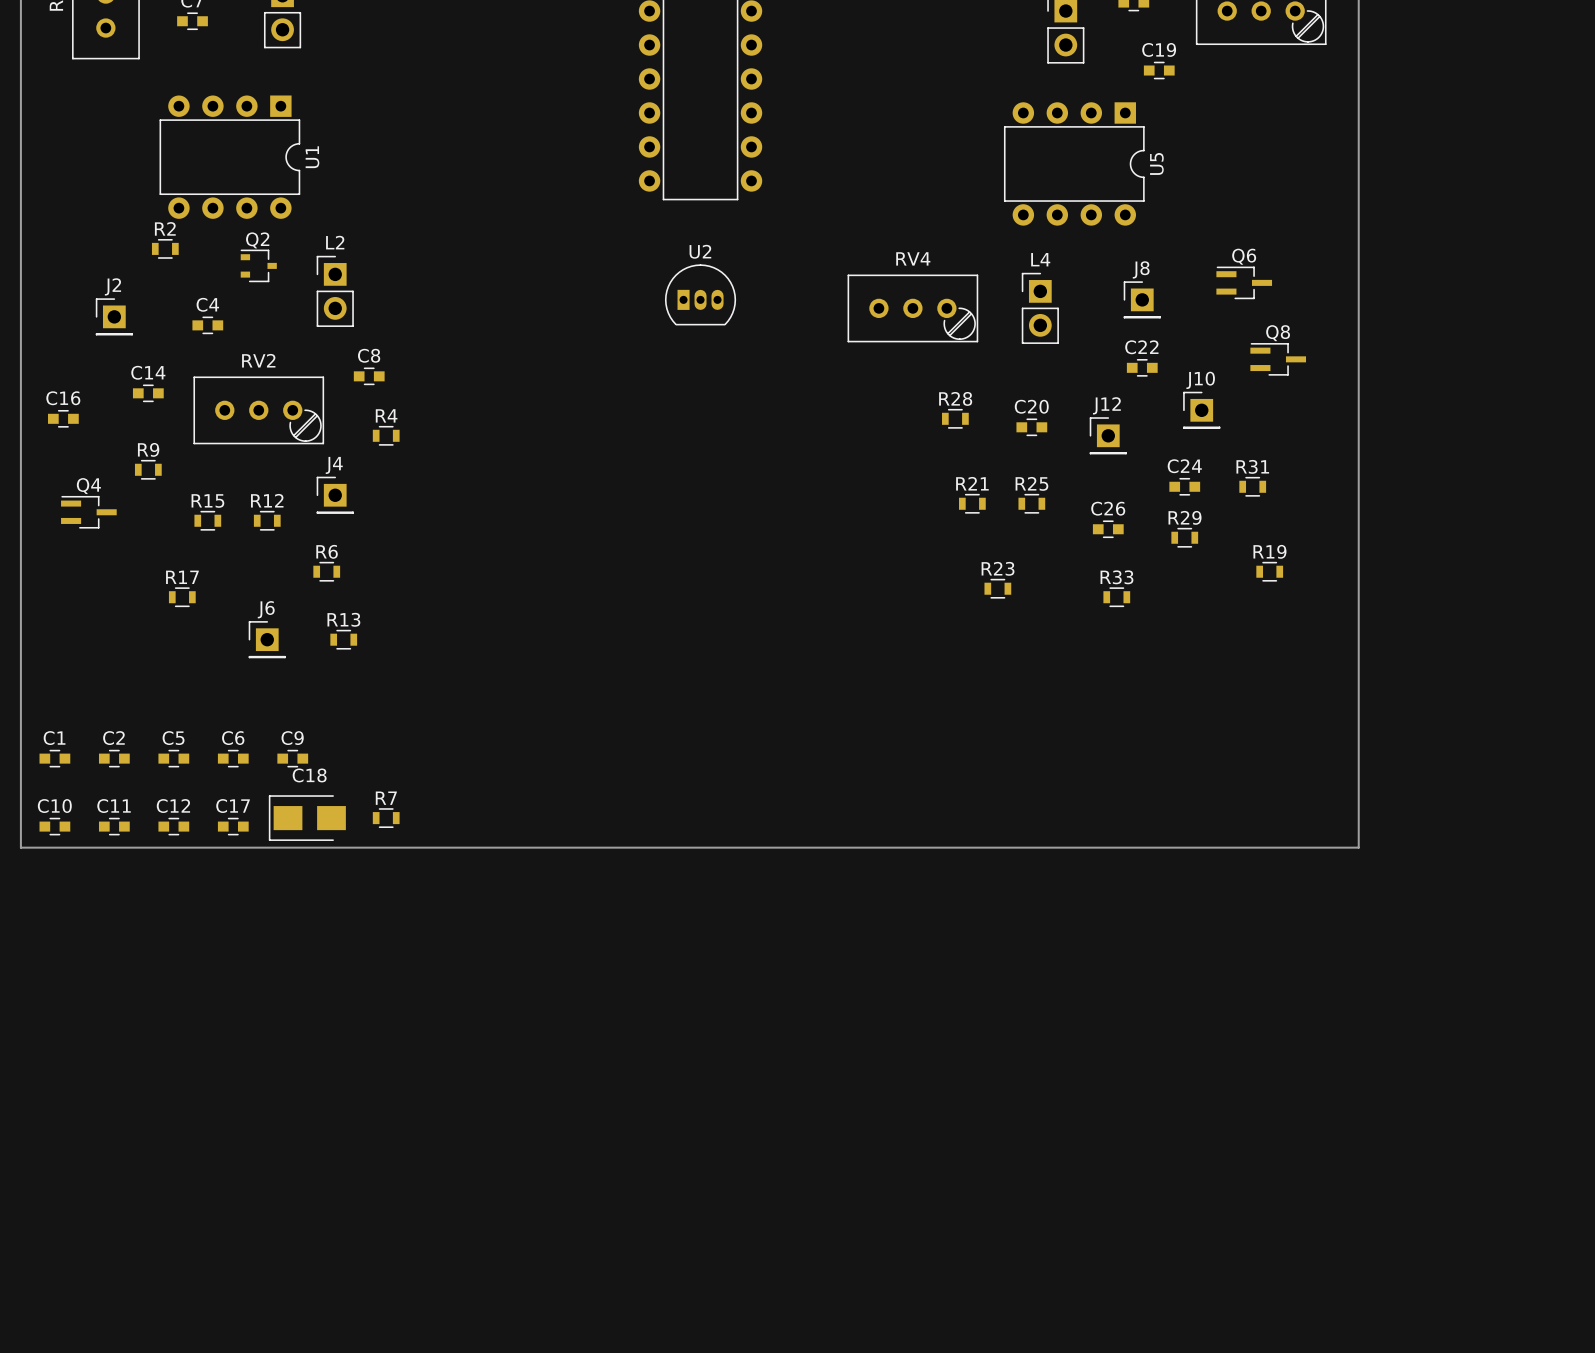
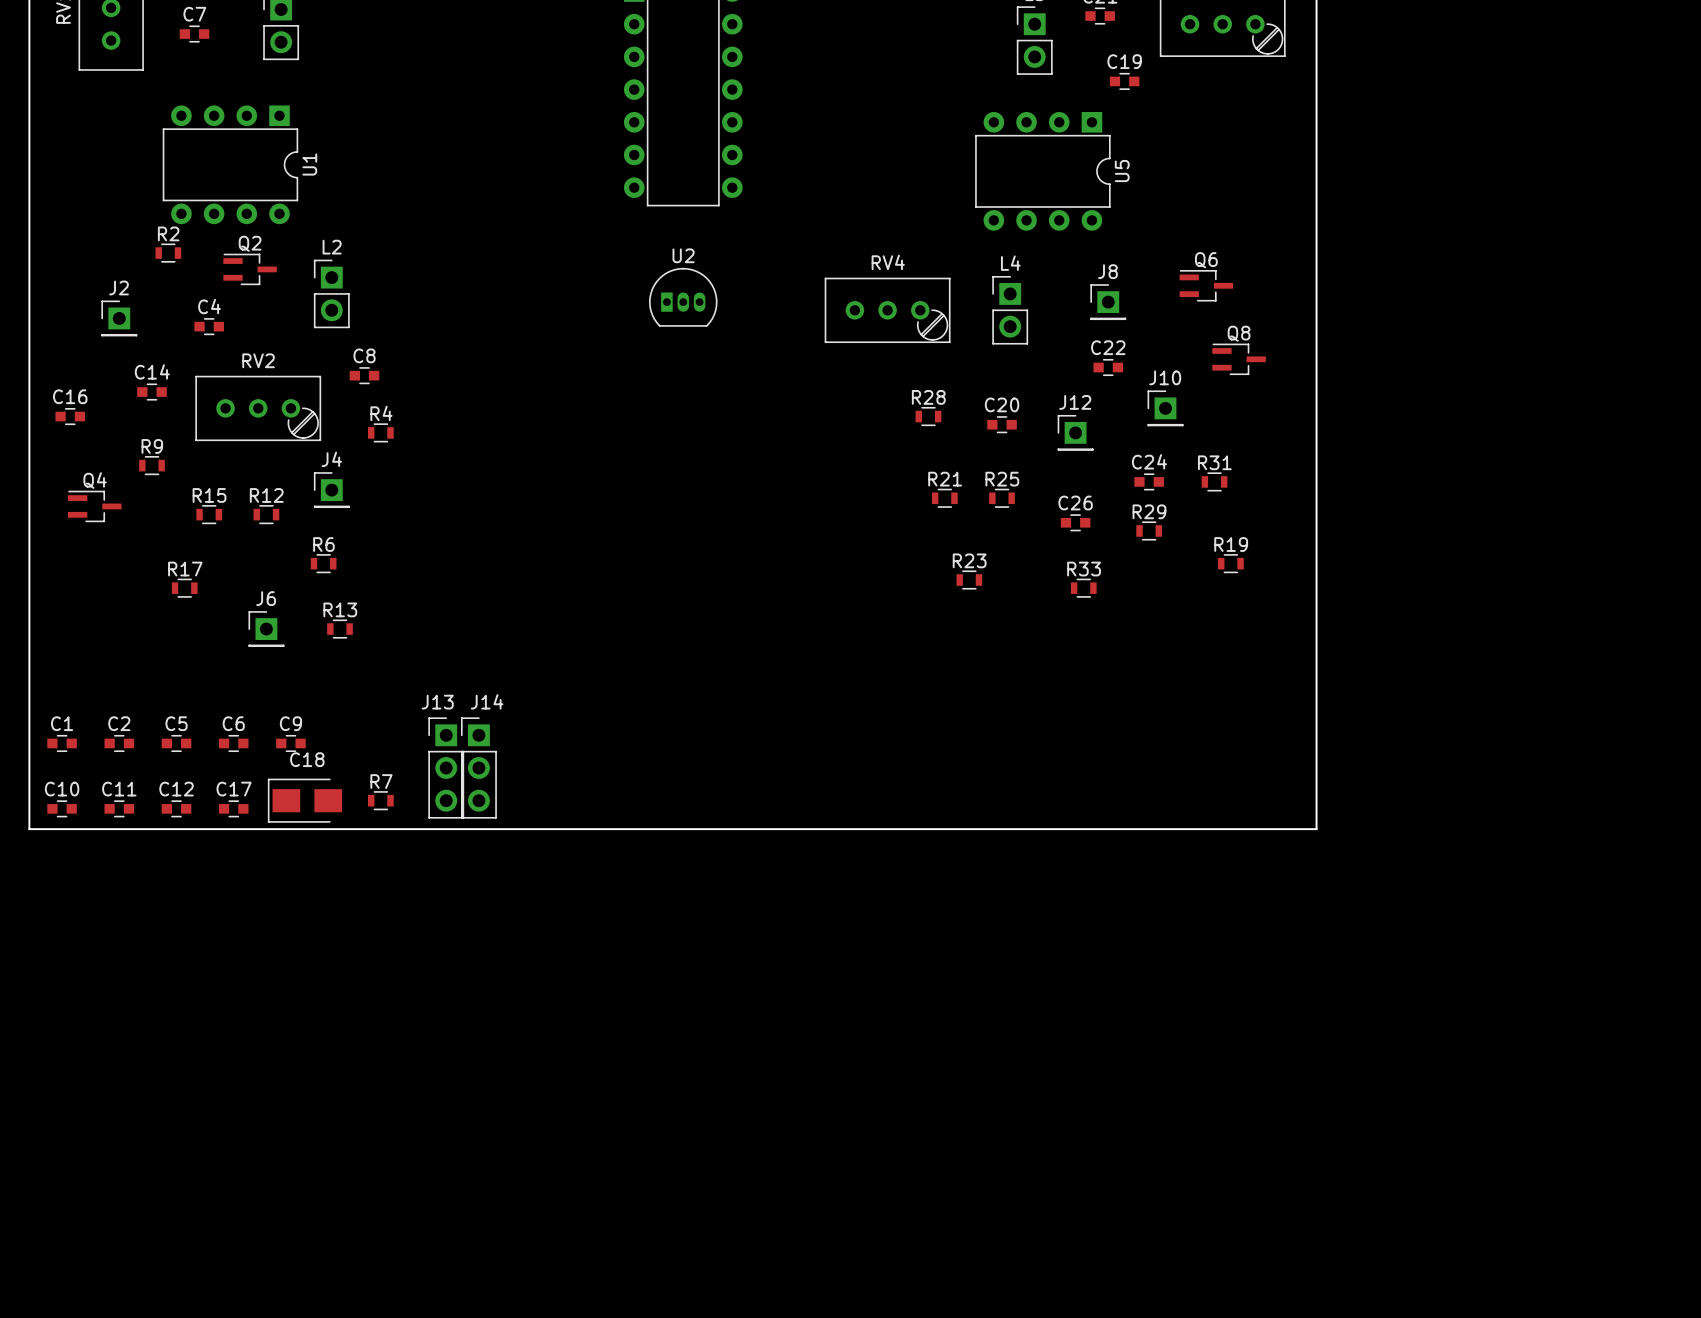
Q2 footprint: [240, 249, 277, 283] -> [223, 253, 277, 286]
J13: none -> (446, 768)
J14: none -> (478, 768)

